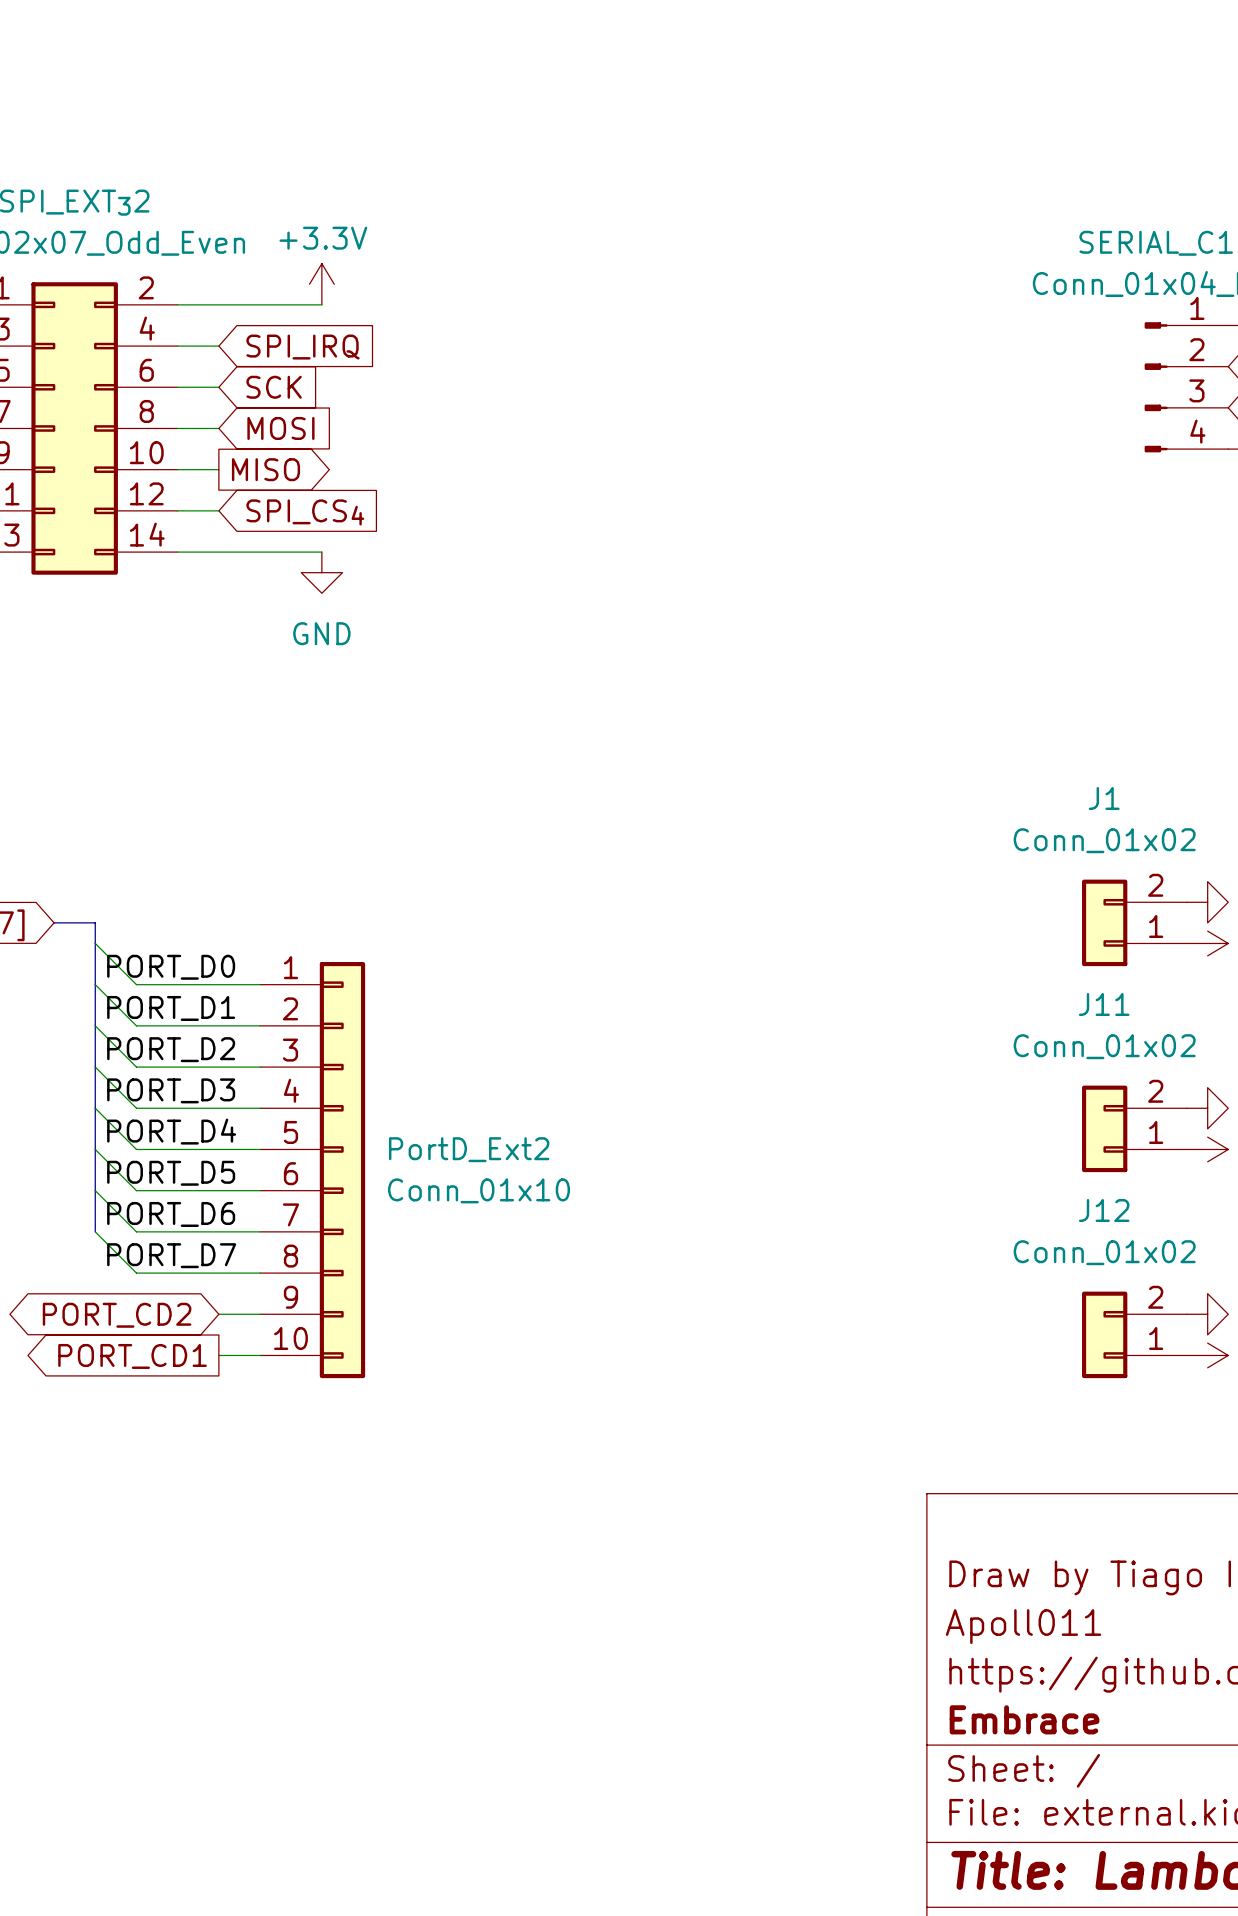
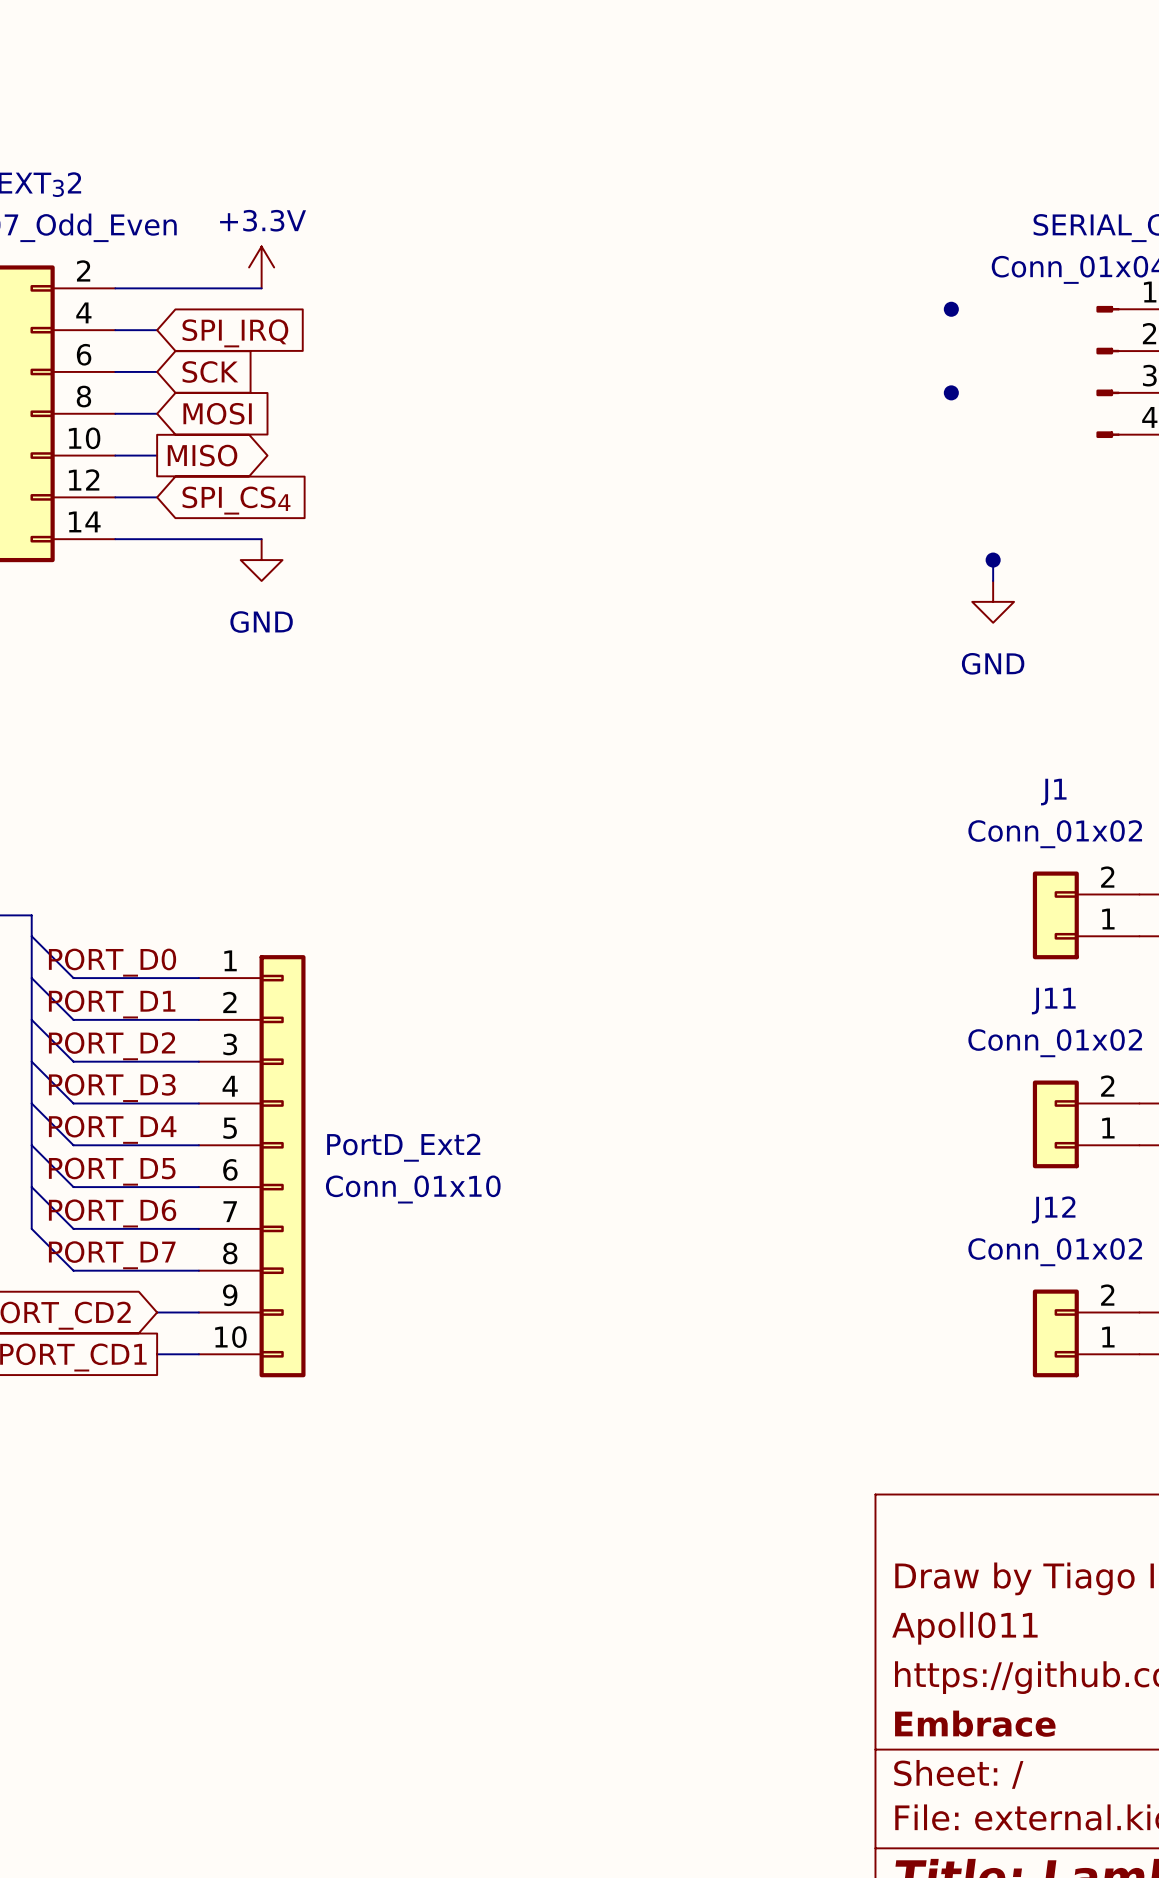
junction: none -> (951, 309)
junction: none -> (951, 392)
wire: none -> (993, 560) (993, 580)
junction: none -> (993, 560)
power symbol: none -> GND (993, 601)

